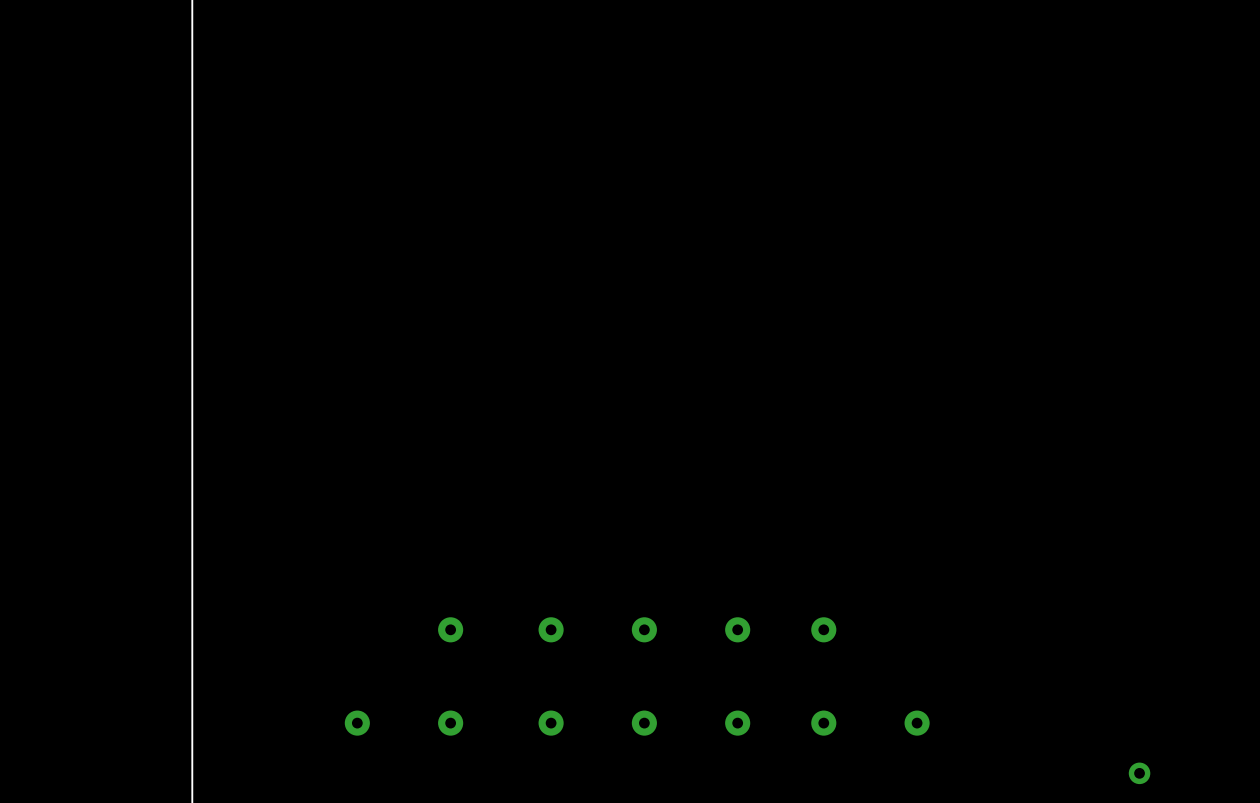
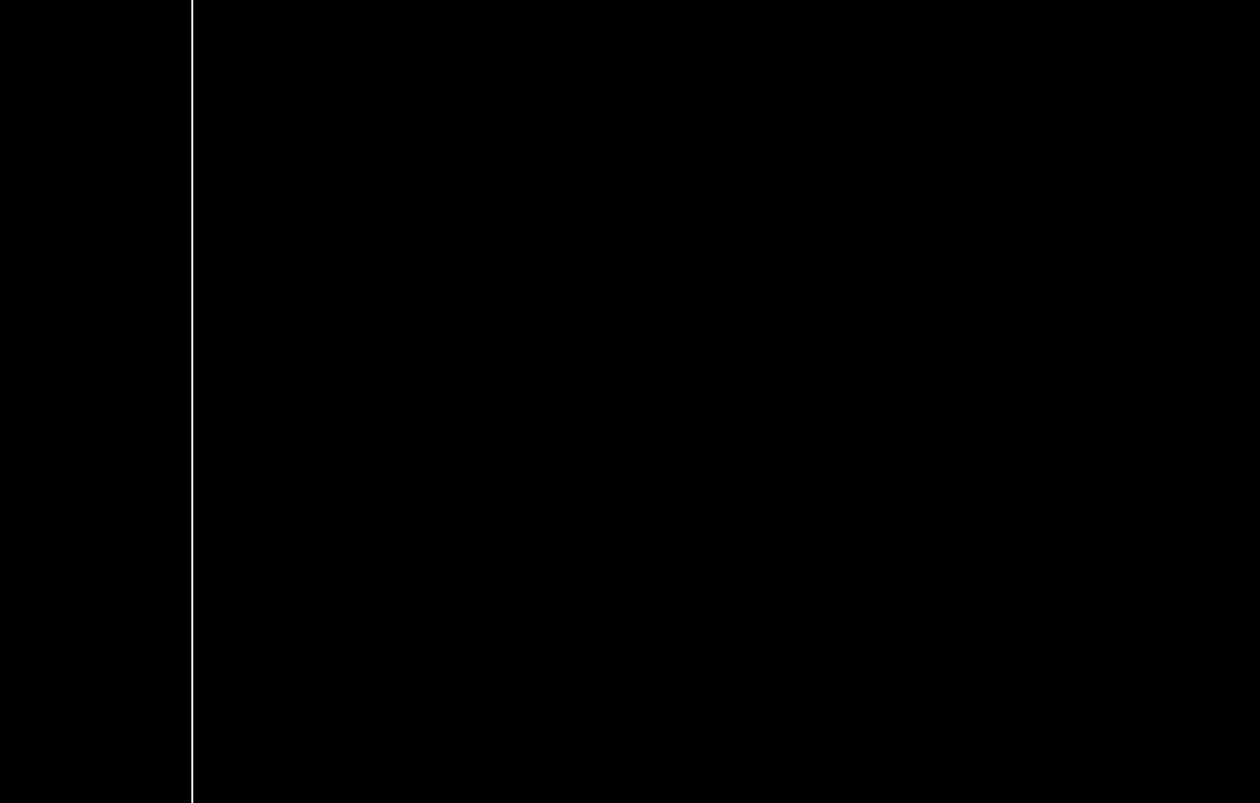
via: (450, 629) -> none
via: (551, 629) -> none
via: (644, 629) -> none
via: (737, 629) -> none
via: (823, 629) -> none
via: (357, 723) -> none
via: (450, 723) -> none
via: (551, 723) -> none
via: (644, 723) -> none
via: (737, 723) -> none
via: (823, 723) -> none
via: (917, 723) -> none
via: (1139, 773) -> none

